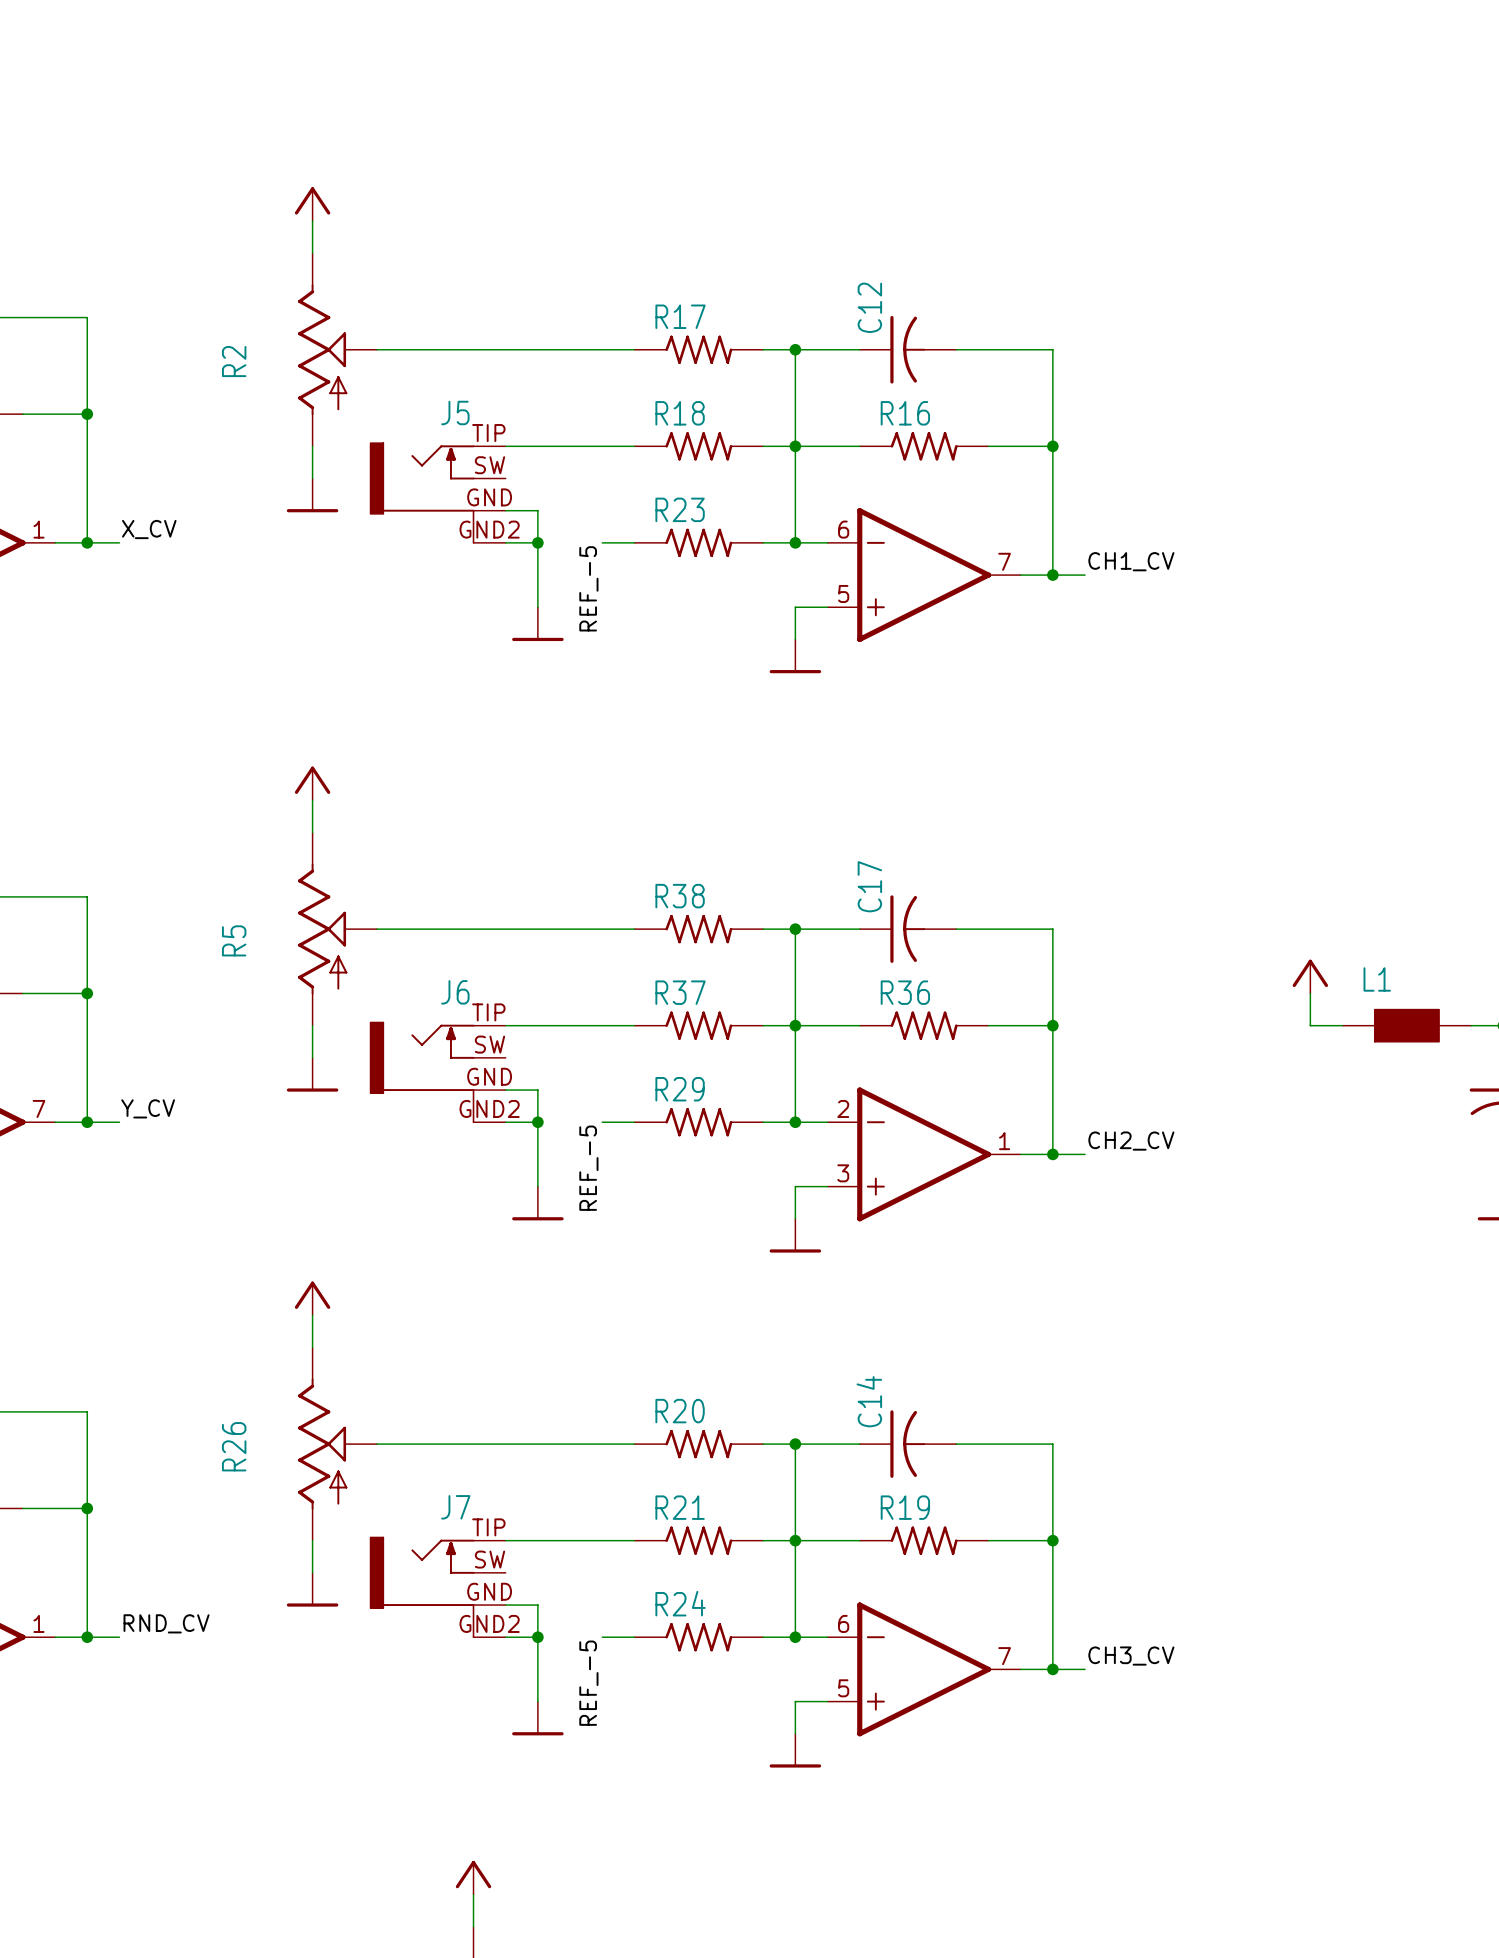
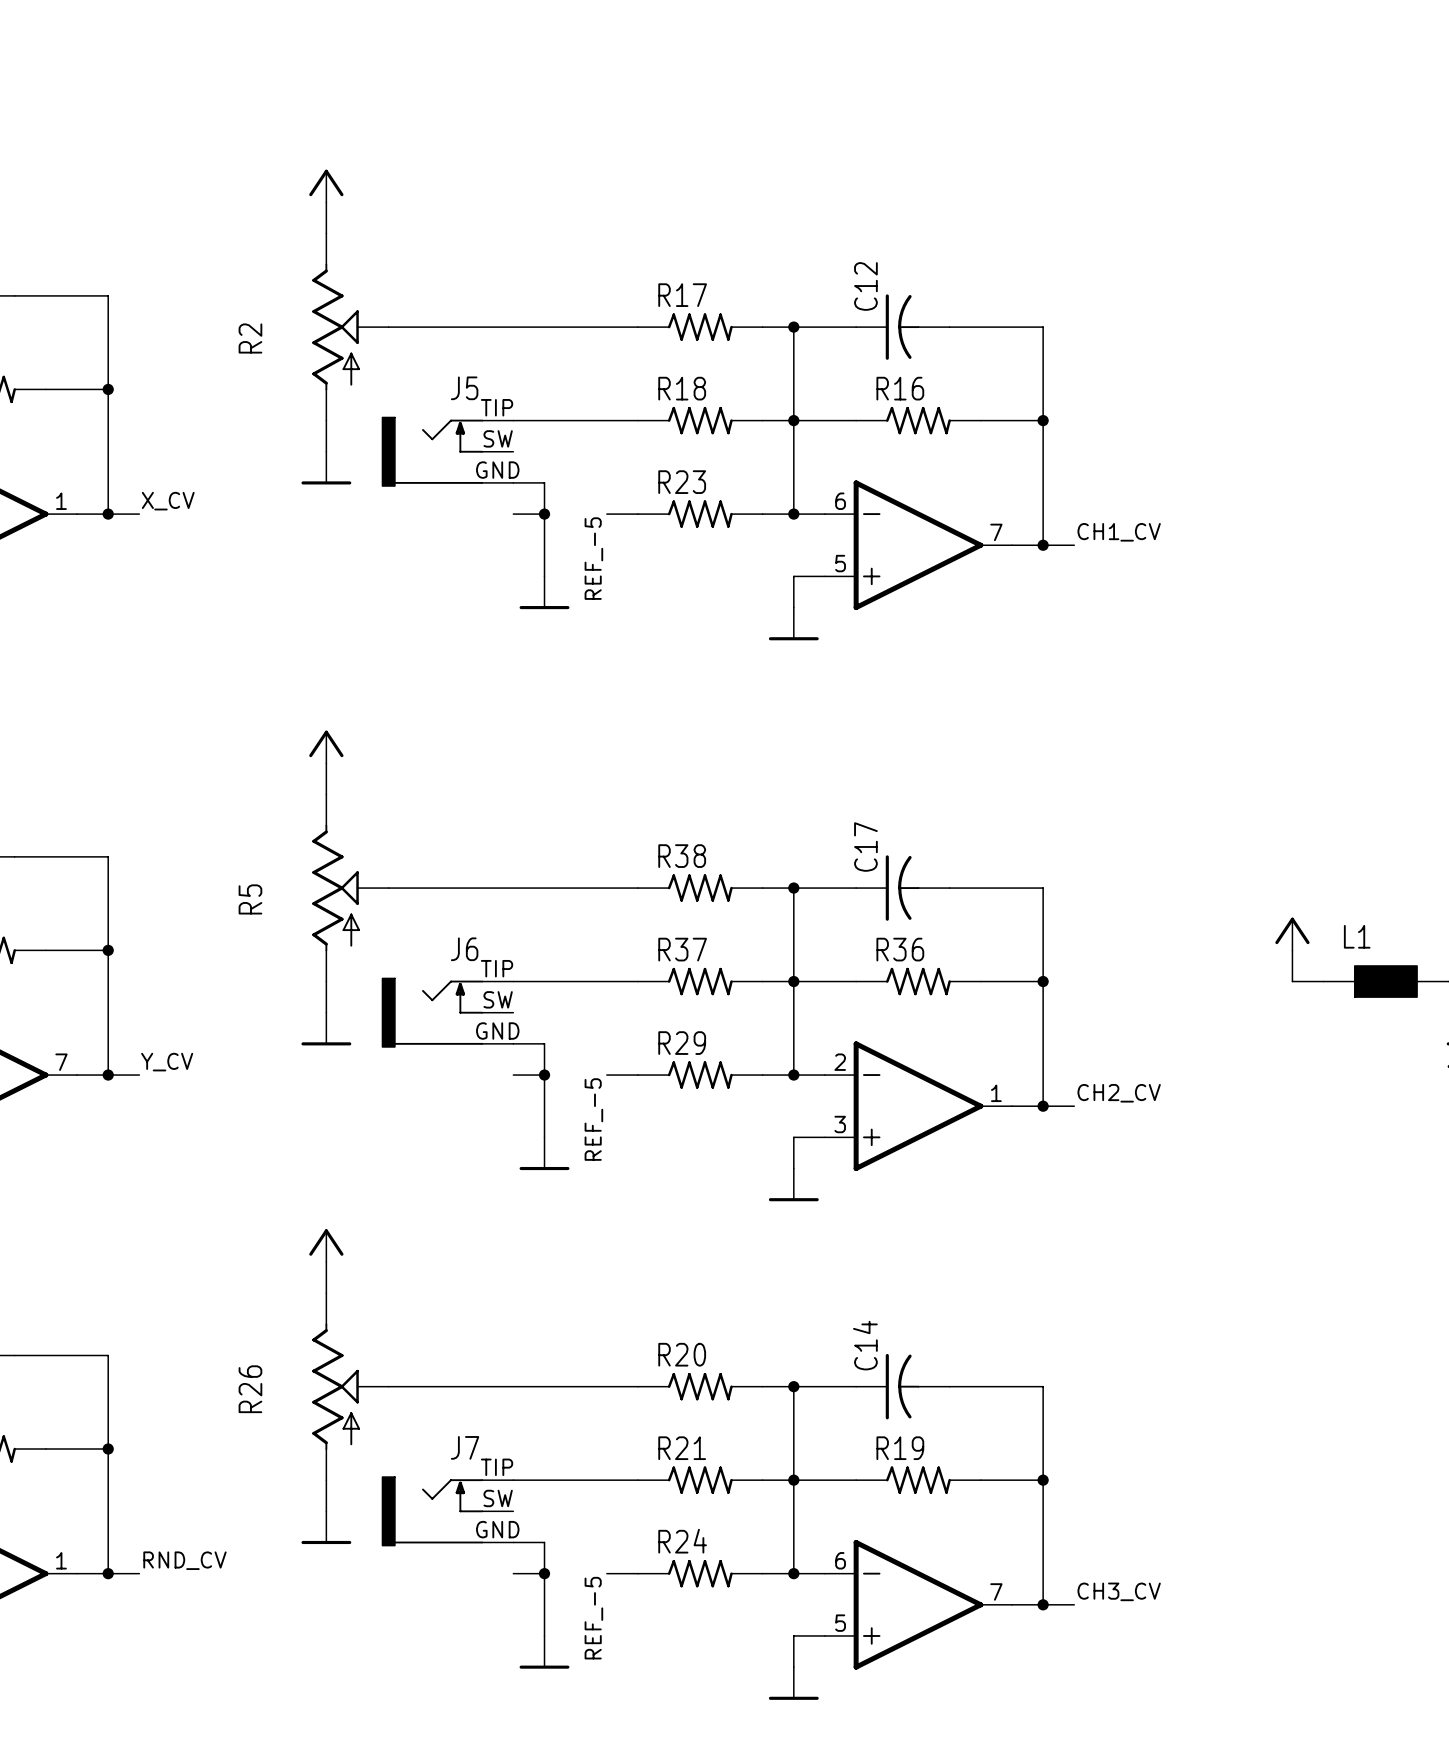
J5 symbol: [370, 443, 506, 544] -> [382, 417, 514, 487]
J6 symbol: [370, 1022, 506, 1124] -> [382, 978, 514, 1047]
J7 symbol: [370, 1537, 506, 1639] -> [382, 1477, 514, 1546]

